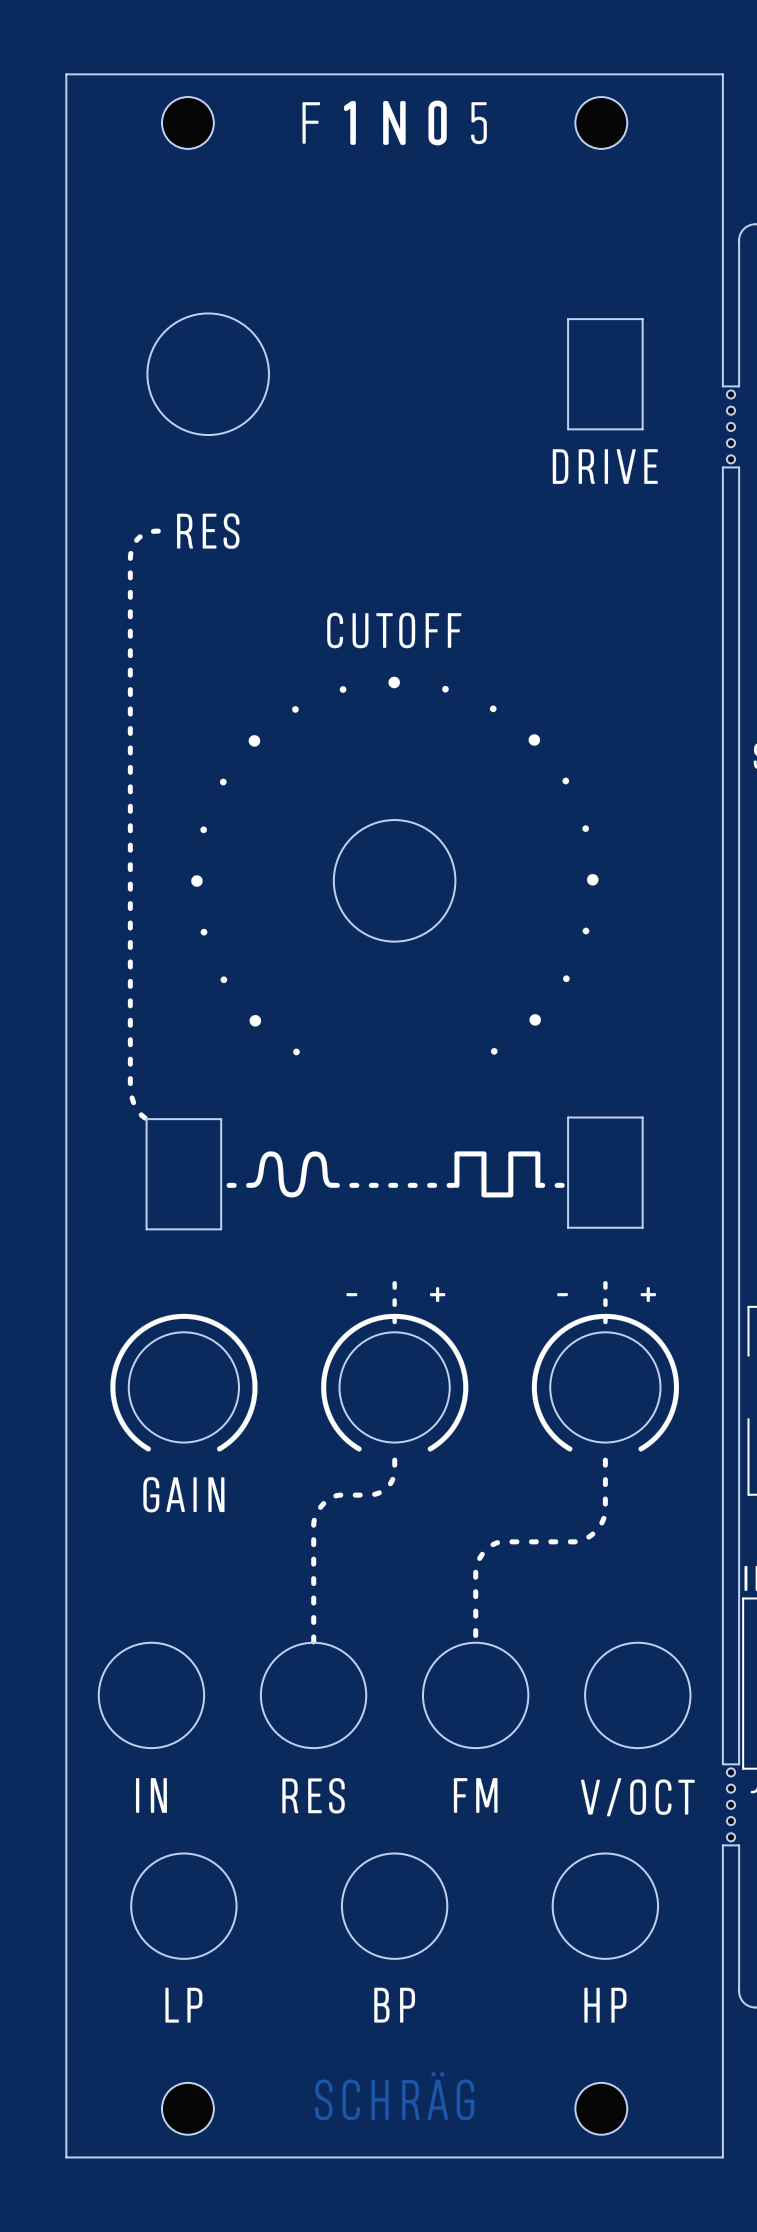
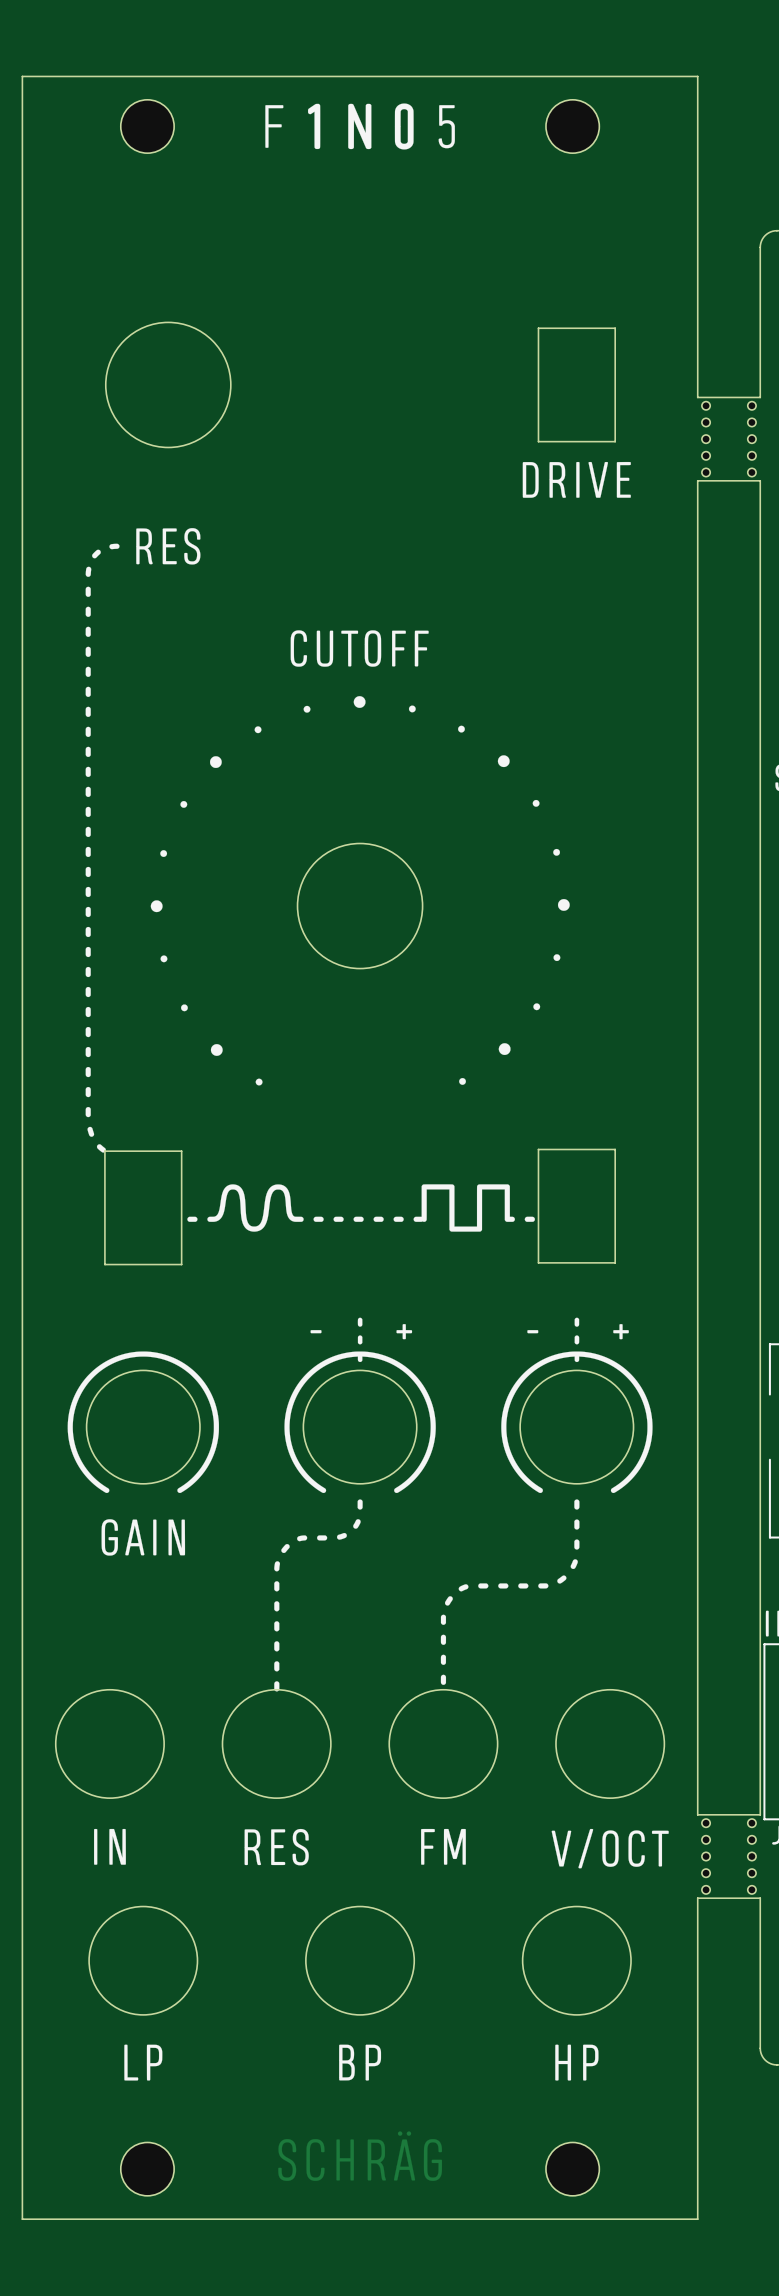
board edge: (66, 74) (66, 2157) -> (68, 76) (22, 76) (22, 2219) (68, 2219)
board edge: (678, 74) (722, 74) (722, 386) -> (697, 76) (697, 397) (743, 397)
part position: (187, 122) -> (147, 126)
part position: (601, 122) -> (572, 126)
board edge: (568, 319) (568, 429) -> (584, 328) (538, 328) (538, 441) (584, 441)
board edge: (598, 319) (642, 319) (642, 429) (598, 429) -> (615, 328) (615, 441)
round board edge position: (208, 374) -> (168, 384)
part: none -> (706, 405)
part: none -> (706, 422)
part: none -> (706, 439)
part: none -> (706, 455)
part: none -> (706, 472)
board edge: (722, 467) (722, 1764) -> (743, 480) (697, 480) (697, 1814) (743, 1814)
round board edge position: (394, 880) -> (360, 906)
drawing position: (402, 1061) -> (368, 1092)
board edge: (568, 1117) (568, 1227) -> (584, 1149) (538, 1149) (538, 1262) (584, 1262)
board edge: (598, 1117) (642, 1117) (642, 1227) (598, 1227) -> (615, 1149) (615, 1262)
board edge: (146, 1119) (146, 1229) -> (150, 1151) (104, 1151) (104, 1264) (150, 1264)
board edge: (176, 1119) (221, 1119) (221, 1229) (176, 1229) -> (181, 1151) (181, 1264)
round board edge position: (183, 1387) -> (143, 1427)
round board edge position: (394, 1387) -> (360, 1427)
round board edge position: (605, 1387) -> (576, 1427)
round board edge position: (151, 1695) -> (109, 1743)
round board edge position: (313, 1695) -> (276, 1743)
round board edge position: (475, 1695) -> (443, 1743)
round board edge position: (637, 1695) -> (610, 1743)
part: none -> (706, 1823)
part: none -> (706, 1839)
part: none -> (706, 1856)
part: none -> (706, 1873)
part: none -> (706, 1889)
board edge: (722, 1845) (722, 2157) (678, 2157) -> (743, 1898) (697, 1898) (697, 2219)
round board edge position: (183, 1906) -> (143, 1960)
round board edge position: (394, 1906) -> (360, 1960)
round board edge position: (605, 1906) -> (576, 1960)
drawing position: (394, 2096) -> (360, 2156)
part position: (187, 2108) -> (147, 2169)
part position: (601, 2108) -> (572, 2169)

